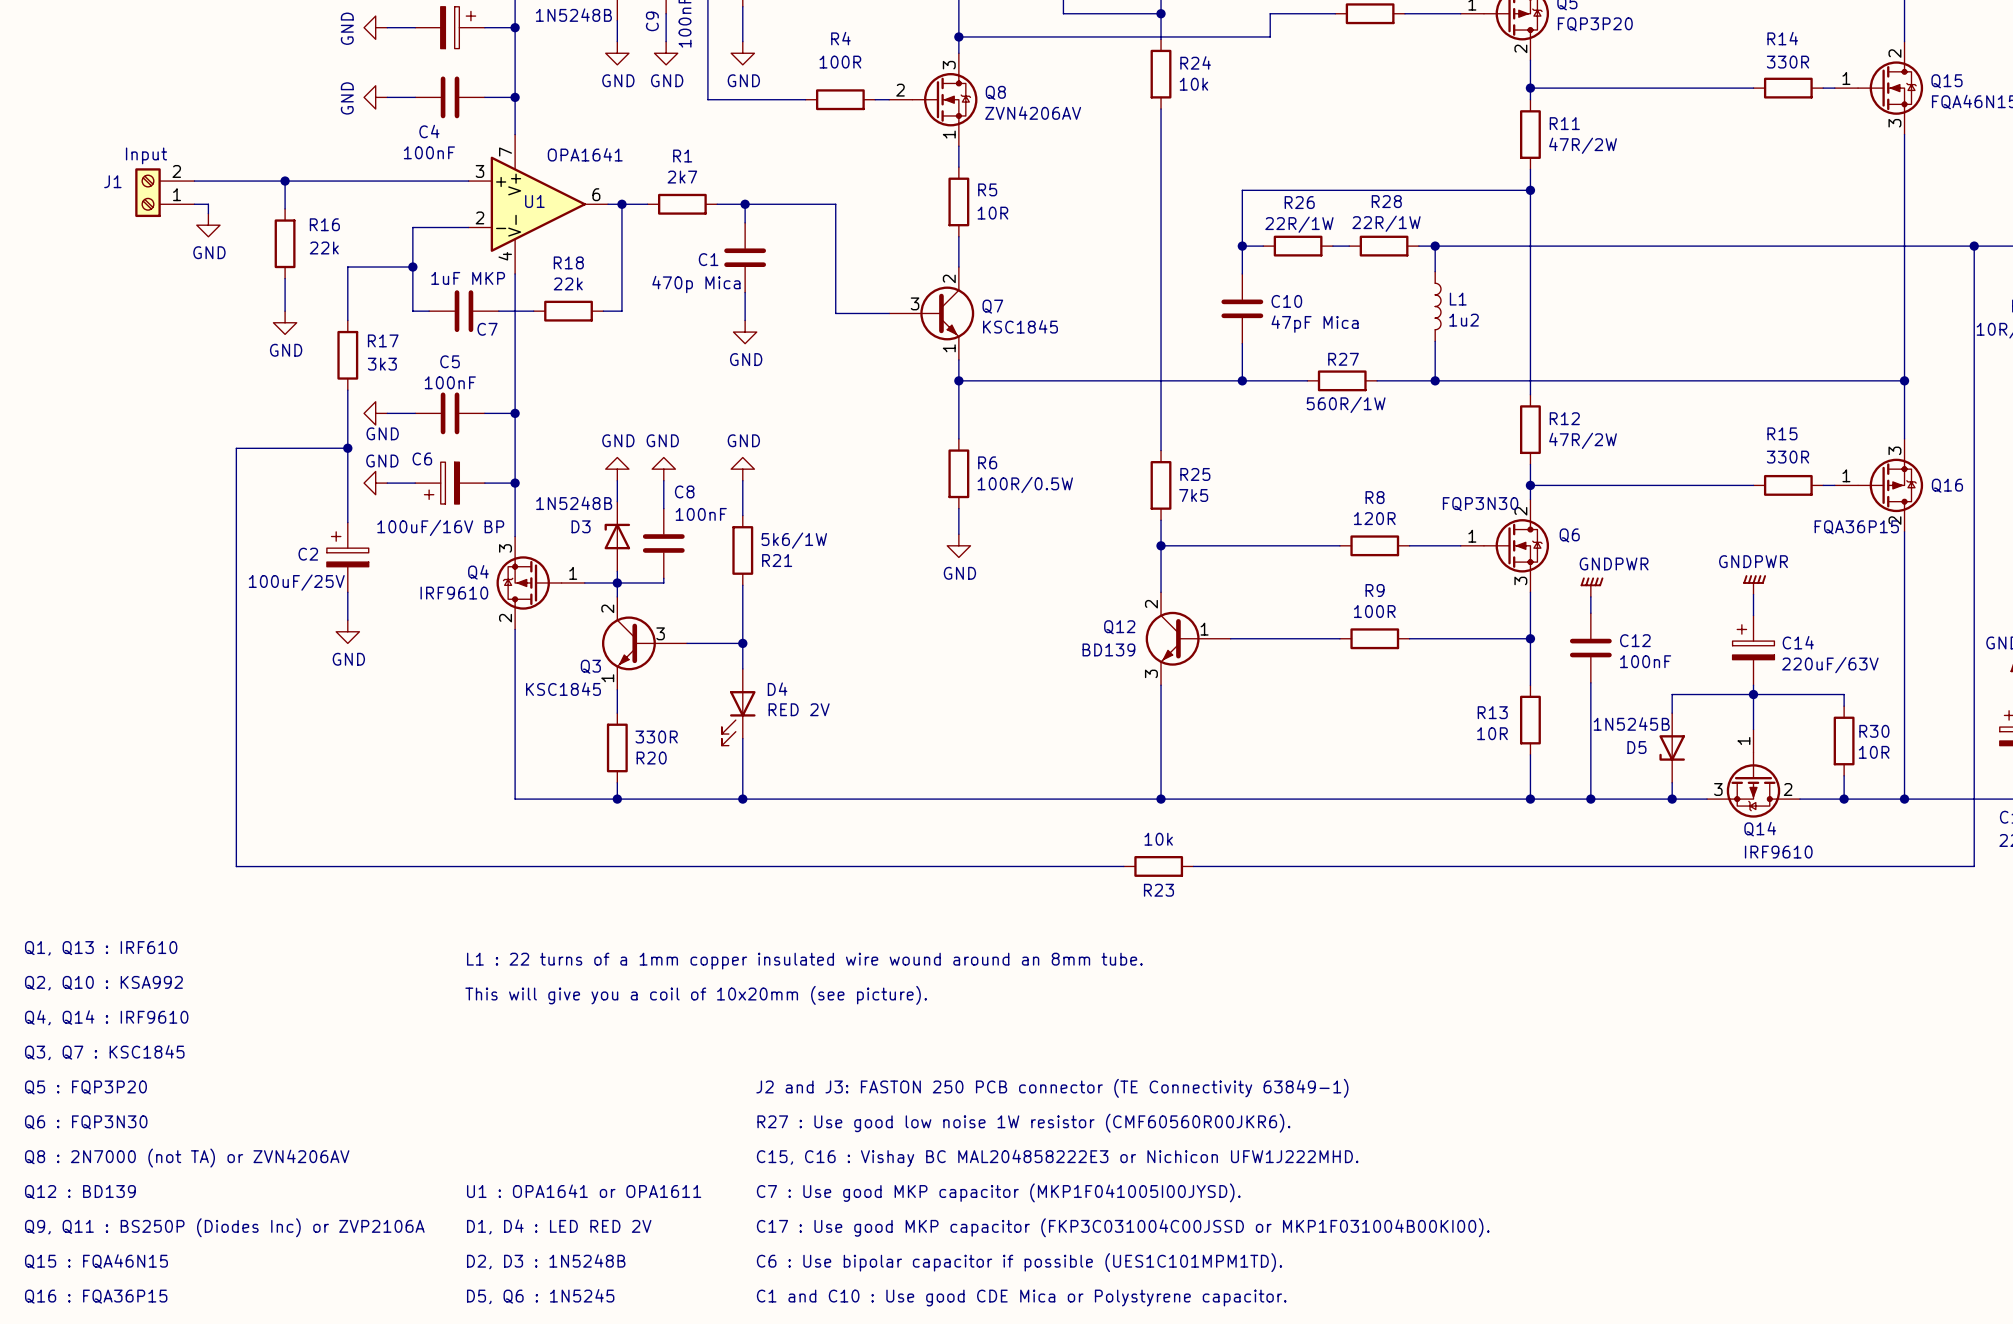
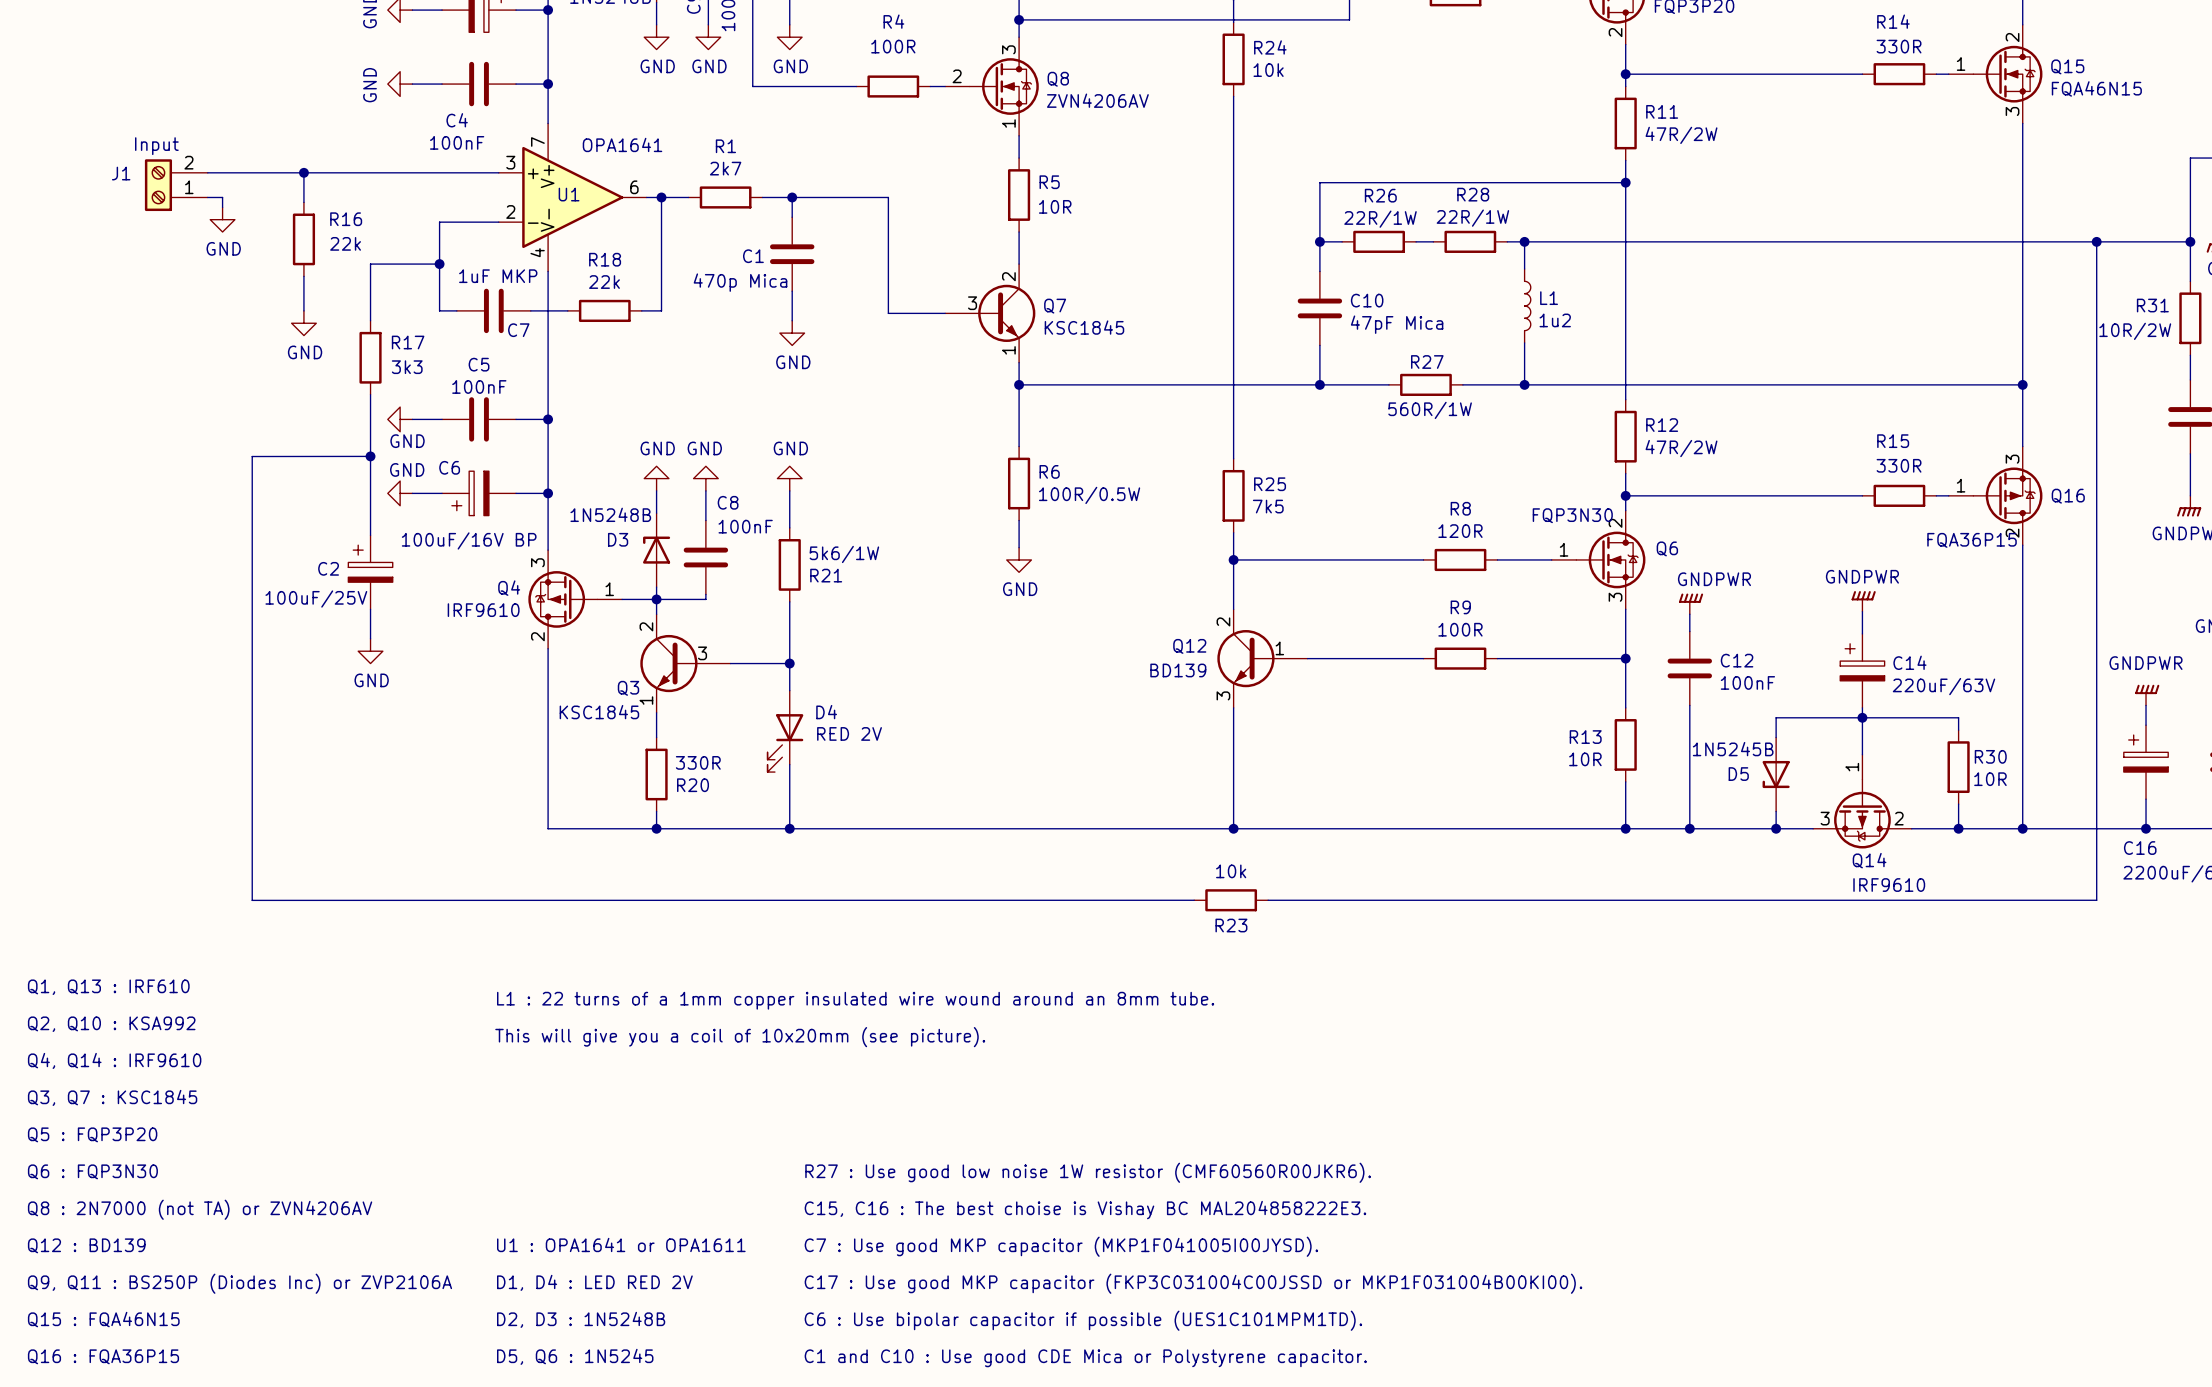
text: J2 and J3: FASTON 250 PCB connector (TE Connectivity 63849-1) (1052, 1088) -> none
text: C15, C16 : Vishay BC MAL204858222E3 or Nichicon UFW1J222MHD. (1057, 1158) -> C15, C16 : The best choise is Vishay BC MAL204858222E3. (1085, 1210)

